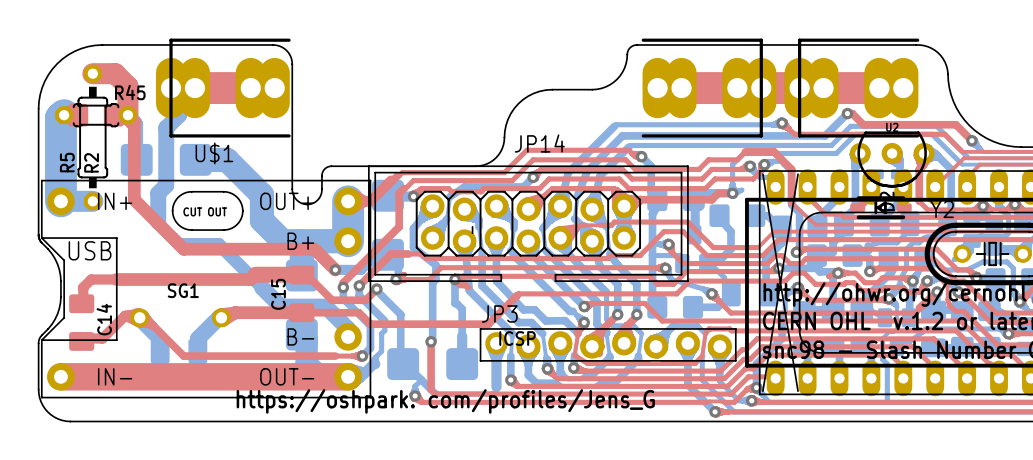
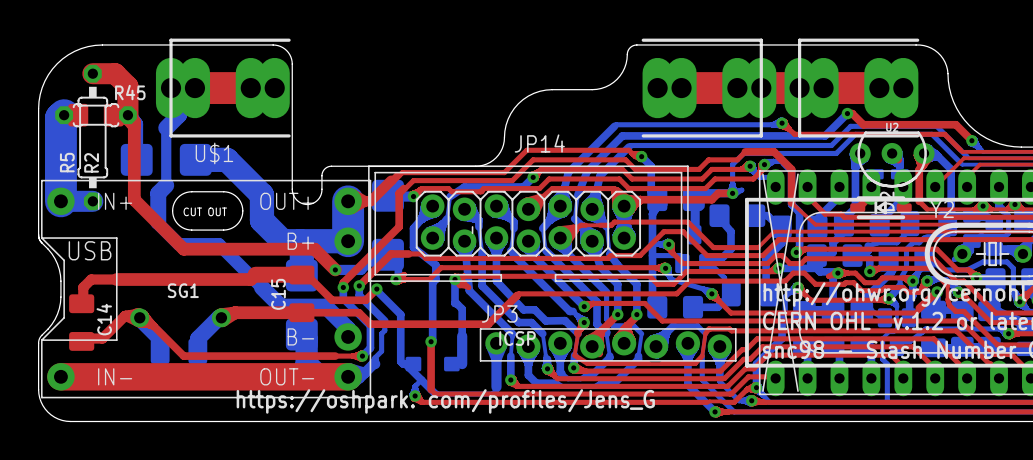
bottom track width: thick (166, 127) (166, 185) -> thin (166, 127) (166, 185)
part footprint: [387, 348, 479, 381] -> [405, 356, 460, 372]

